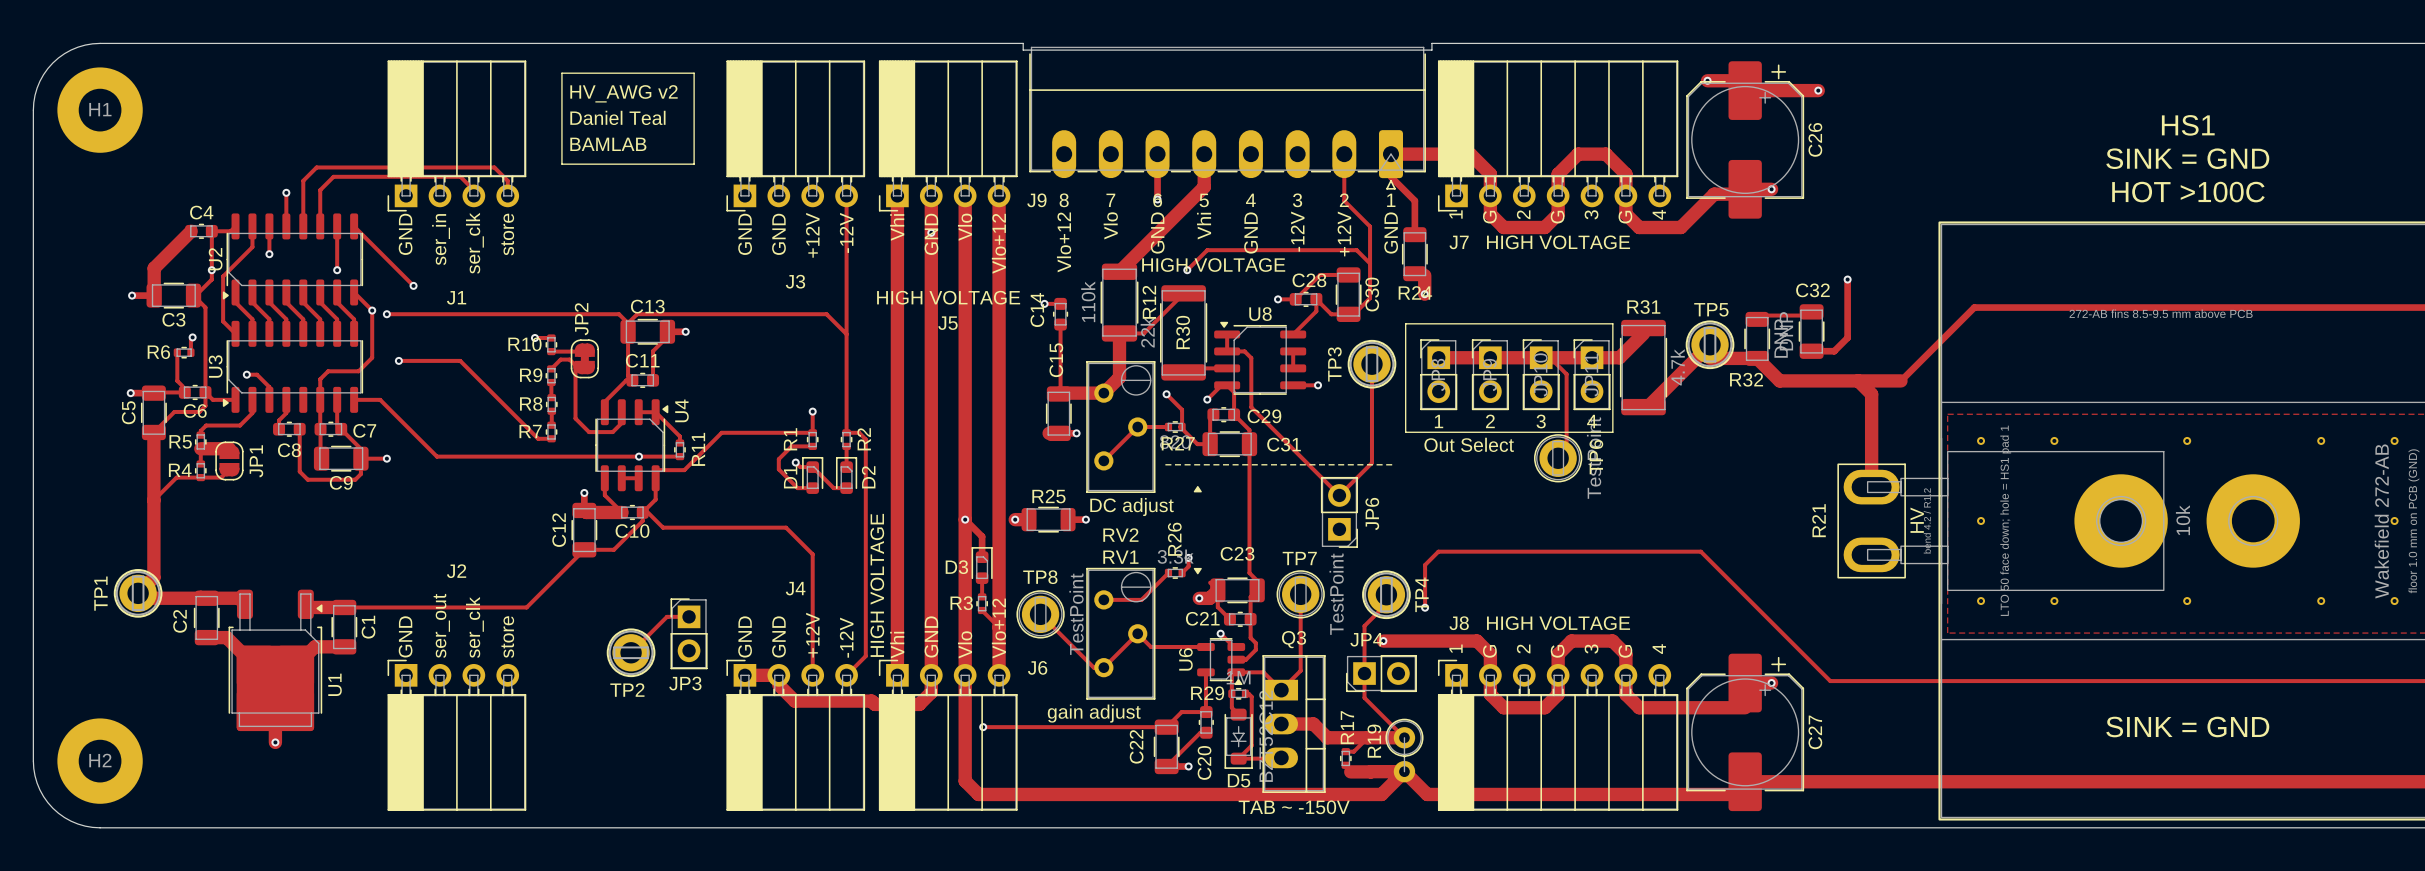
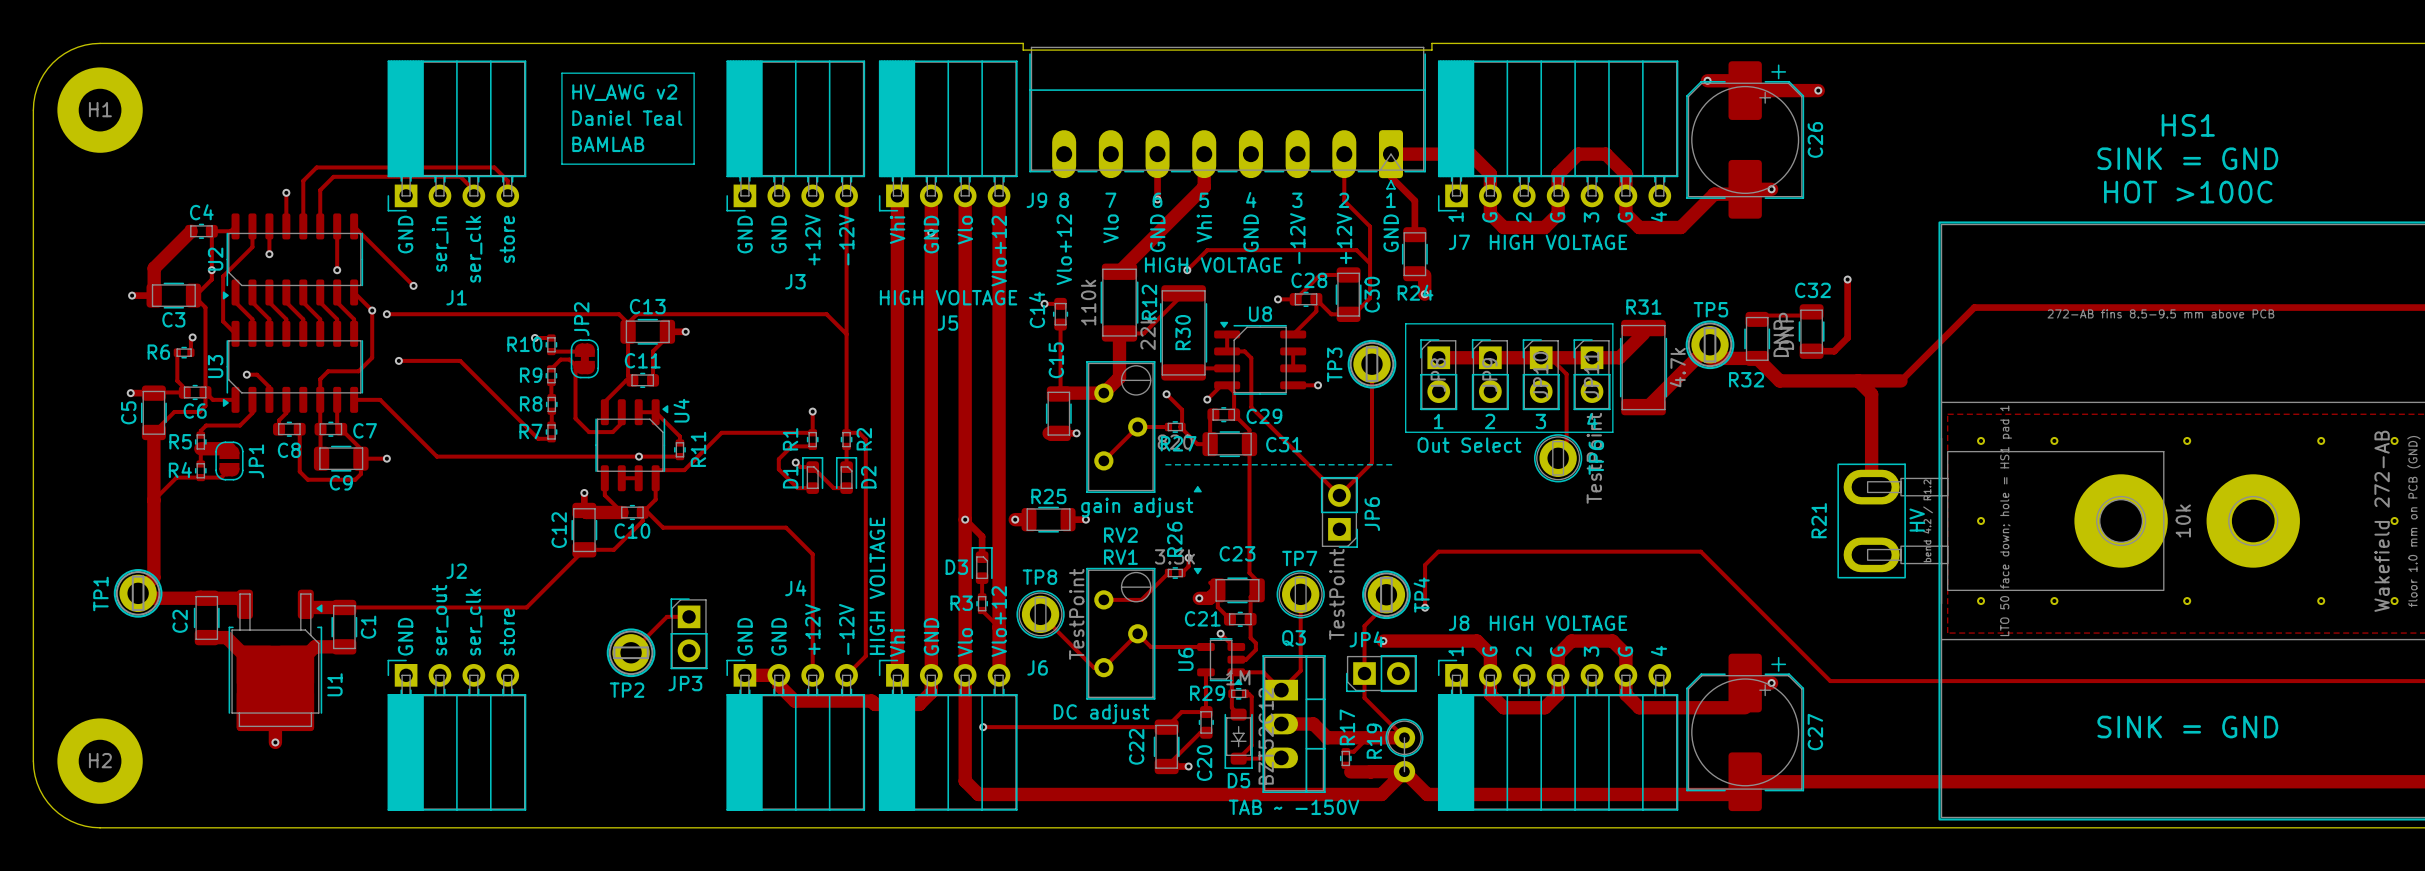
text: DC adjust (1131, 507) -> gain adjust (1137, 507)
text: gain adjust (1094, 713) -> DC adjust (1101, 714)

